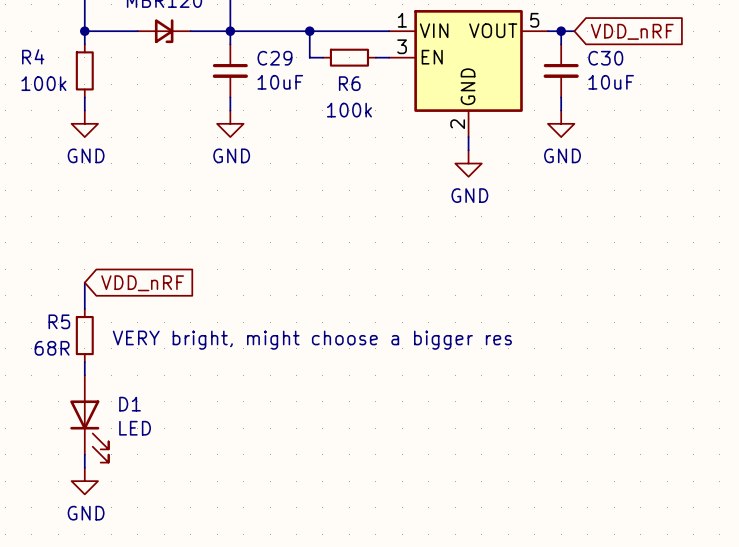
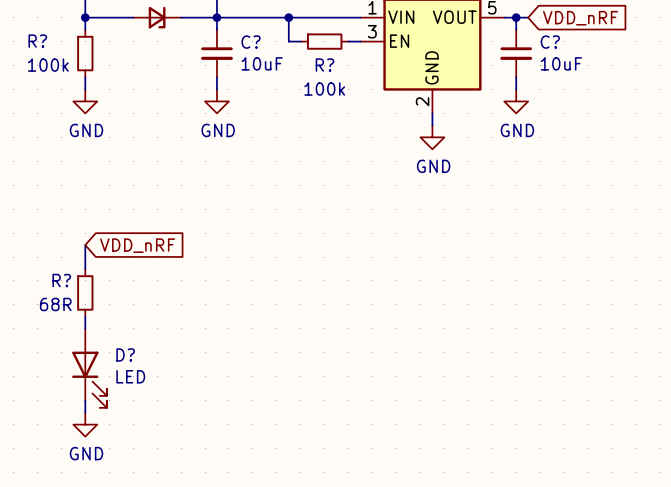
R4 name: R4 (33, 56) -> R? (37, 41)
C29 name: C29 (274, 58) -> C? (251, 42)
C30 name: C30 (605, 58) -> C? (550, 42)
R6 name: R6 (349, 83) -> R? (324, 65)
R5 name: R5 (59, 321) -> R? (61, 280)
text: VERY bright, might choose a bigger res (312, 340) -> none
D1 name: D1 (130, 404) -> D? (125, 354)

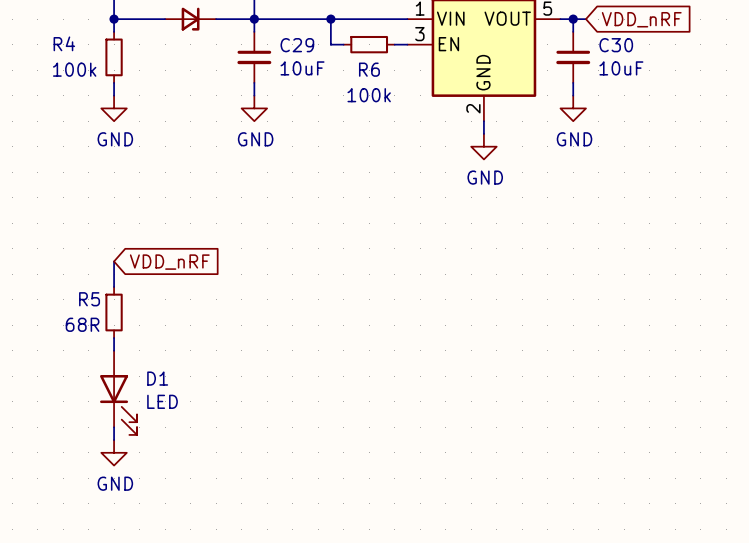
R? name: R? (37, 41) -> R4 (64, 43)
C? name: C? (251, 42) -> C29 (297, 45)
C? name: C? (550, 42) -> C30 (616, 45)
R? name: R? (324, 65) -> R6 (369, 69)
R? name: R? (61, 280) -> R5 (89, 299)
D? name: D? (125, 354) -> D1 (157, 378)

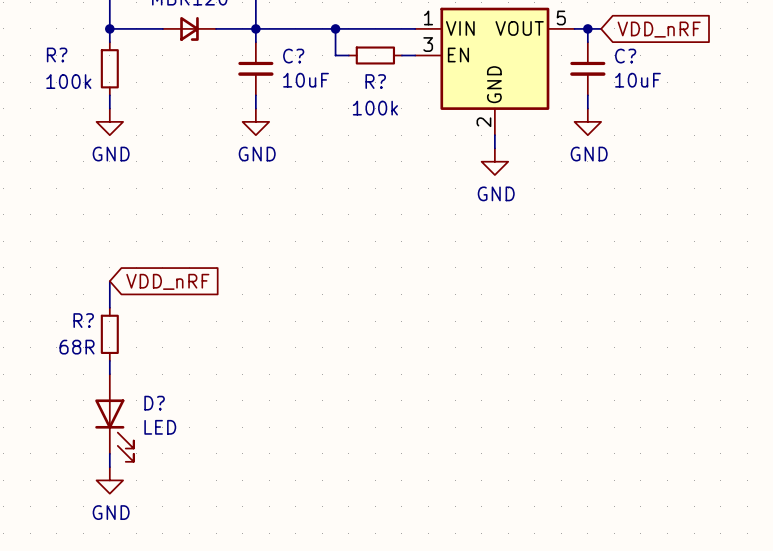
R4 name: R4 (64, 43) -> R? (57, 55)
C29 name: C29 (297, 45) -> C? (293, 56)
C30 name: C30 (616, 45) -> C? (625, 56)
R6 name: R6 (369, 69) -> R? (375, 81)
R5 name: R5 (89, 299) -> R? (83, 320)
D1 name: D1 (157, 378) -> D? (154, 403)

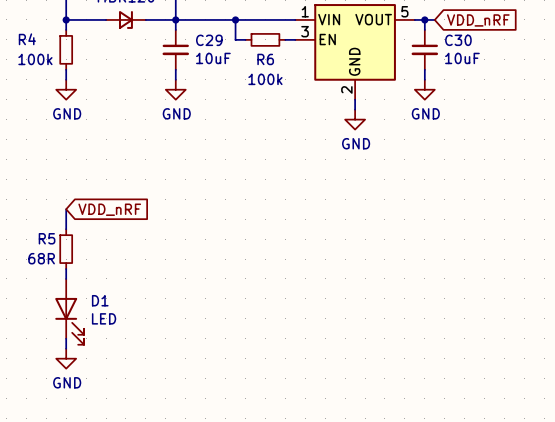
R? name: R? (57, 55) -> R4 (27, 39)
C? name: C? (293, 56) -> C29 (209, 40)
C? name: C? (625, 56) -> C30 (458, 40)
R? name: R? (375, 81) -> R6 (265, 59)
R? name: R? (83, 320) -> R5 (47, 238)
D? name: D? (154, 403) -> D1 (100, 300)

